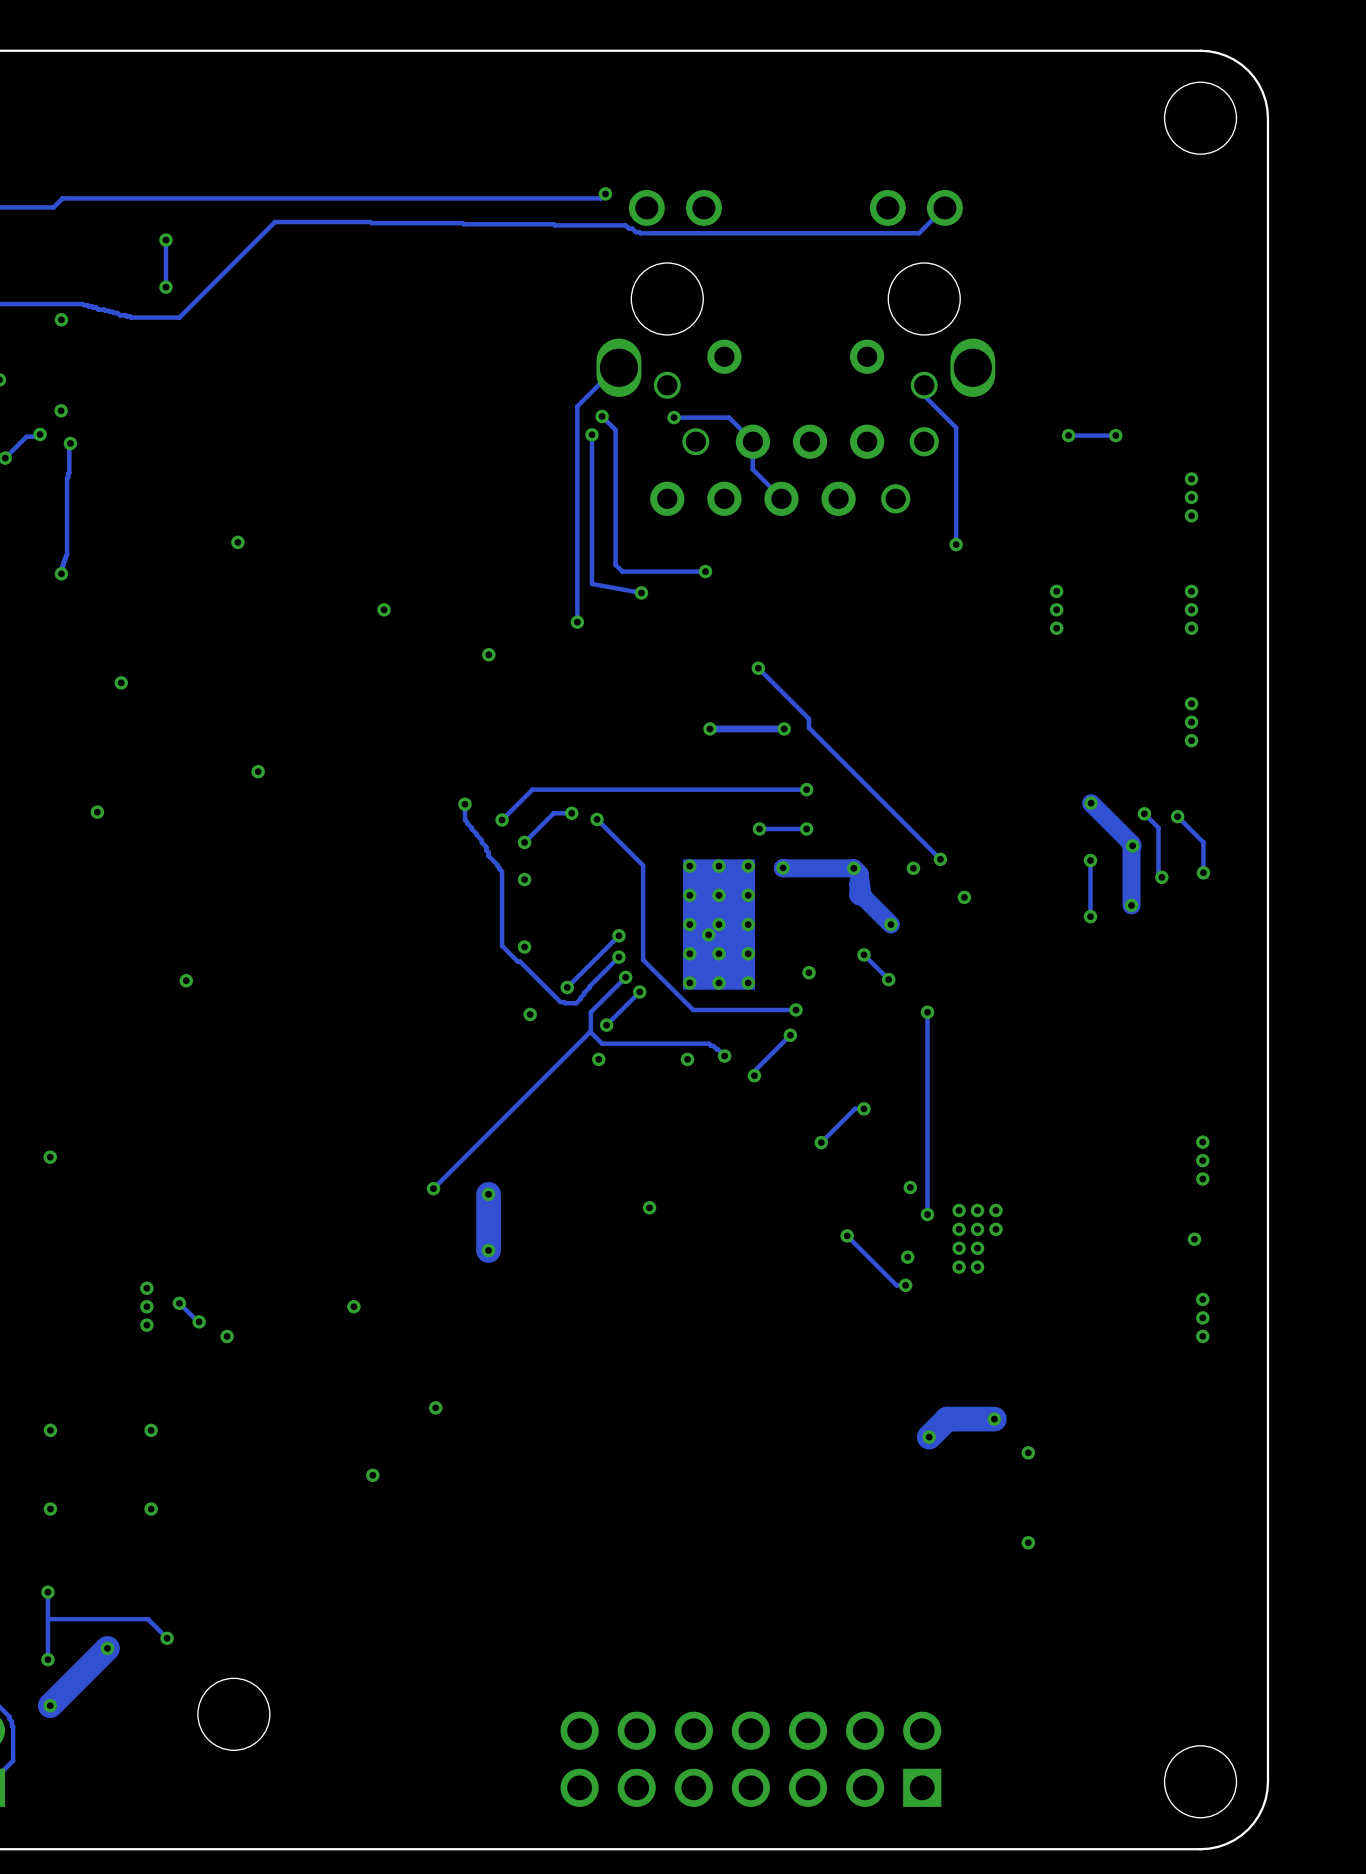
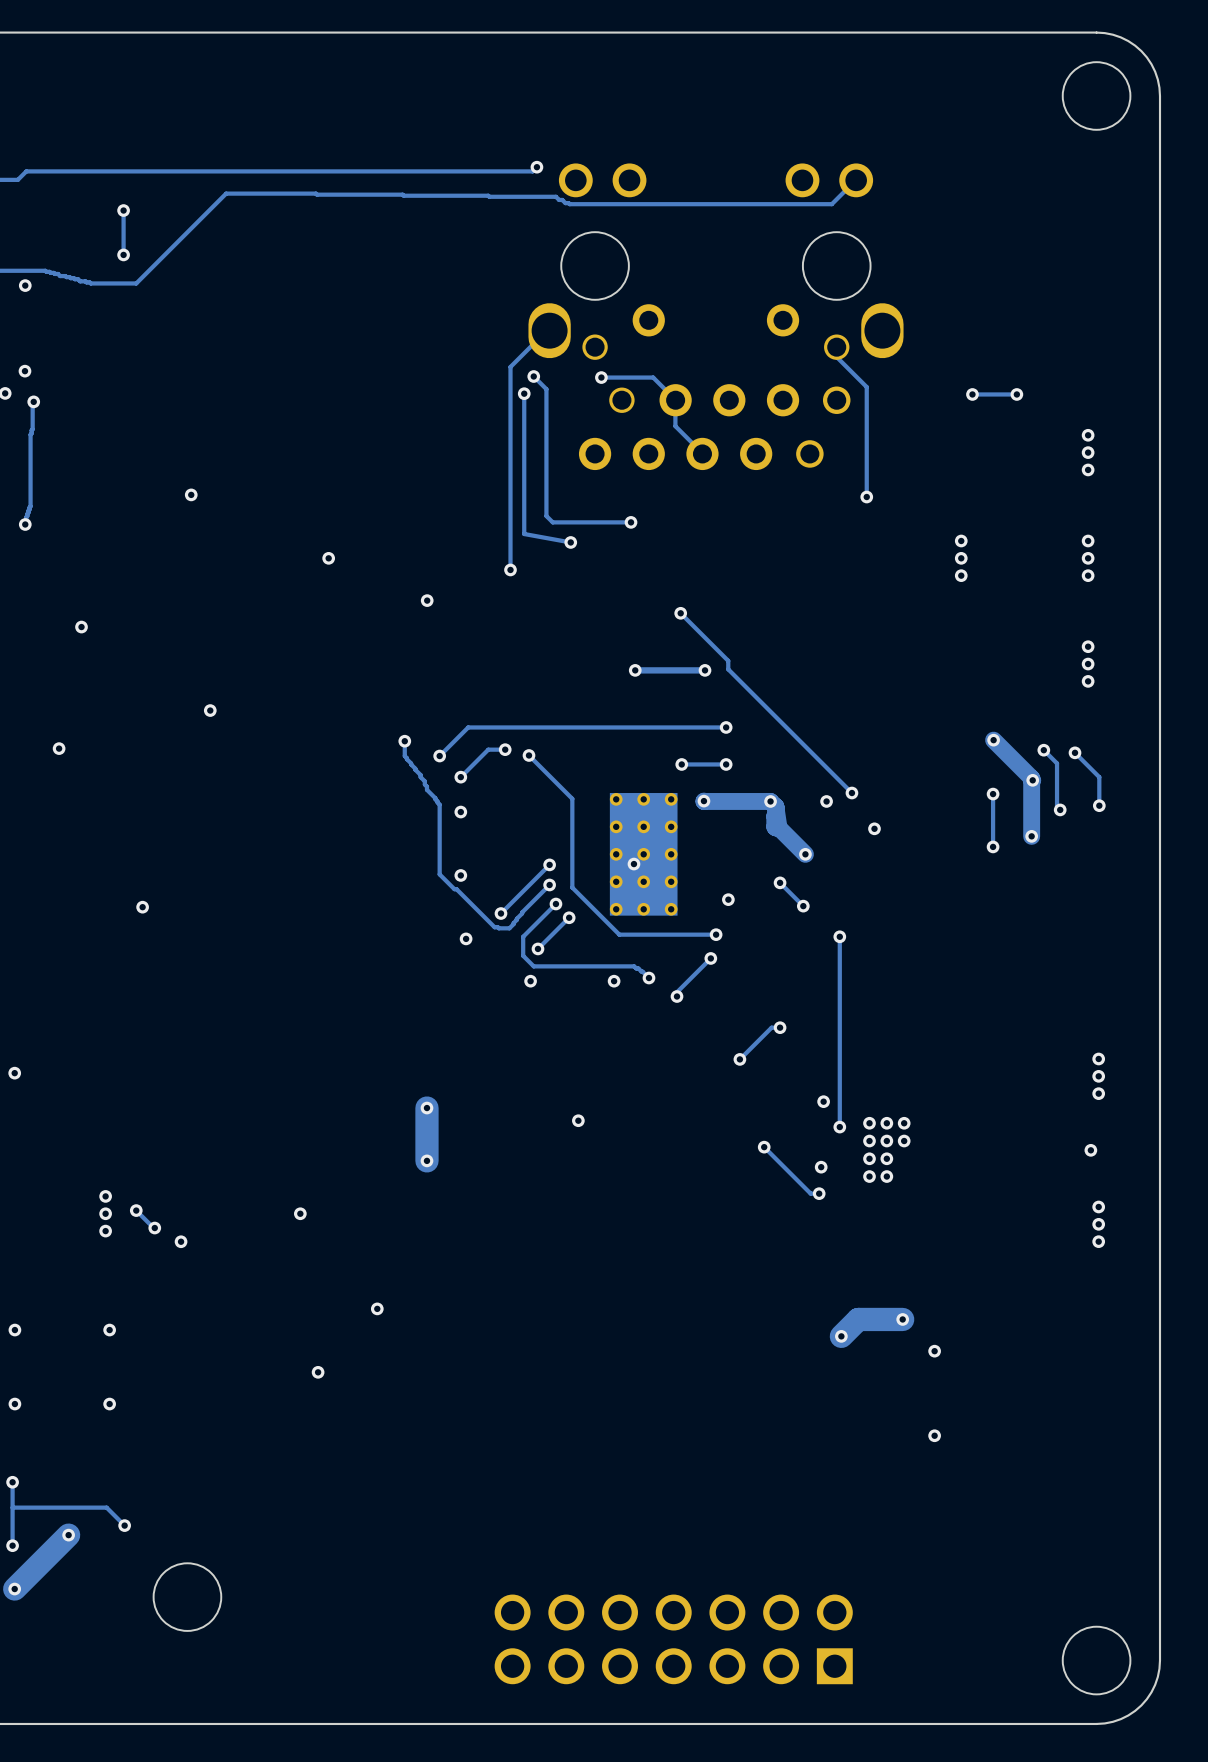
track: (590, 1032) (433, 1188) -> none
via: (433, 1188) -> none

